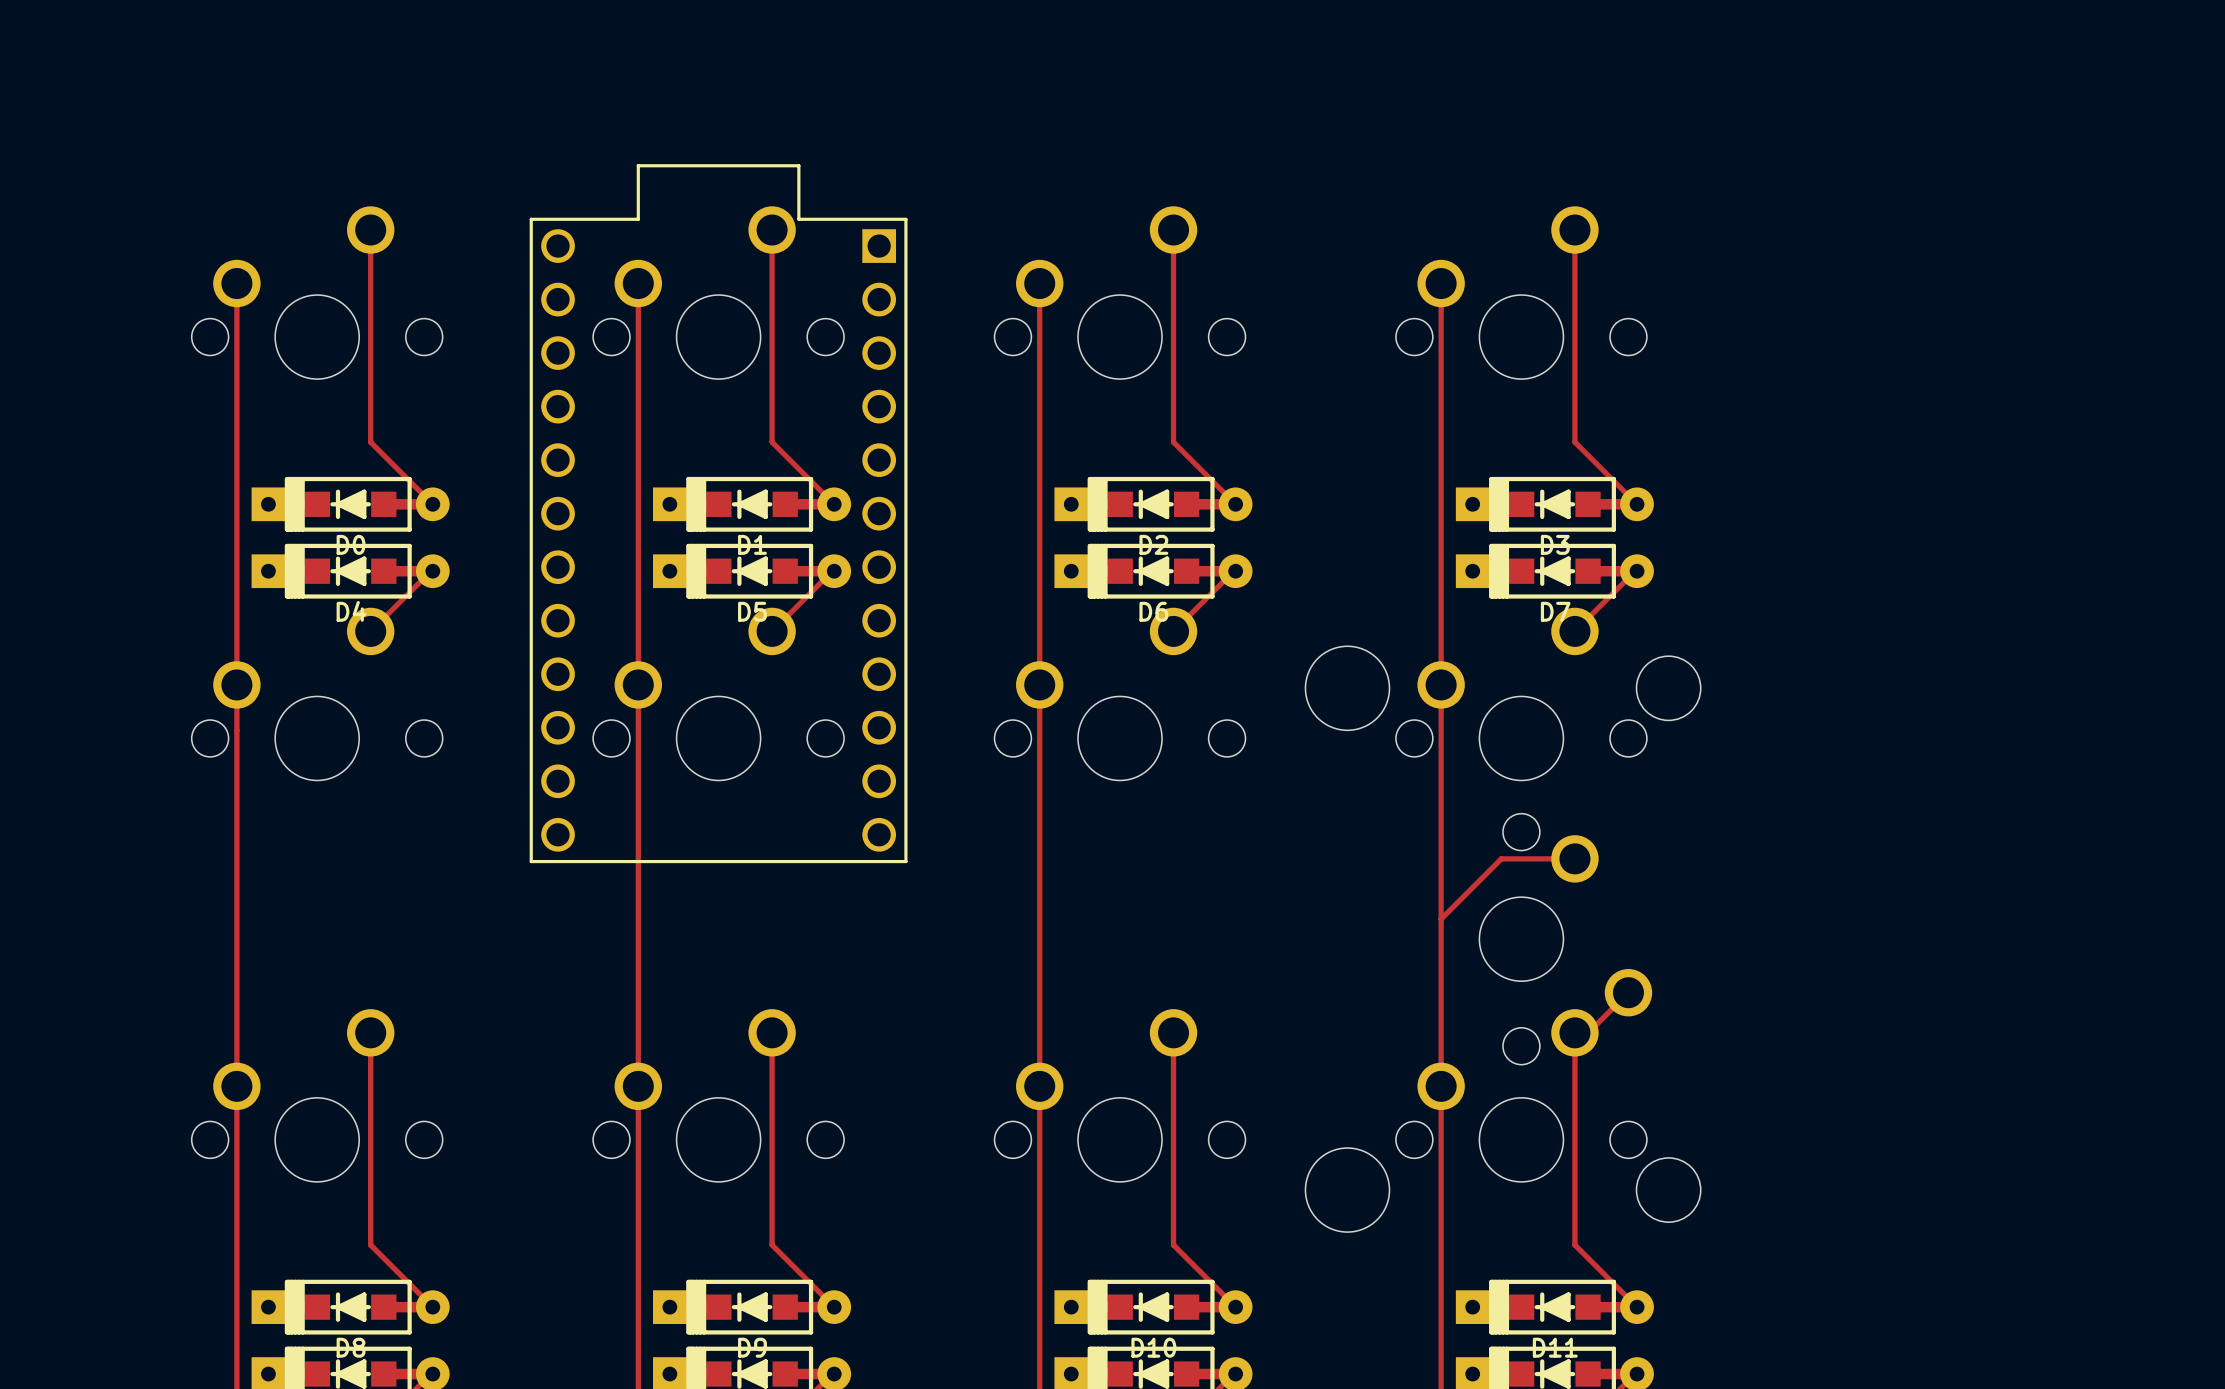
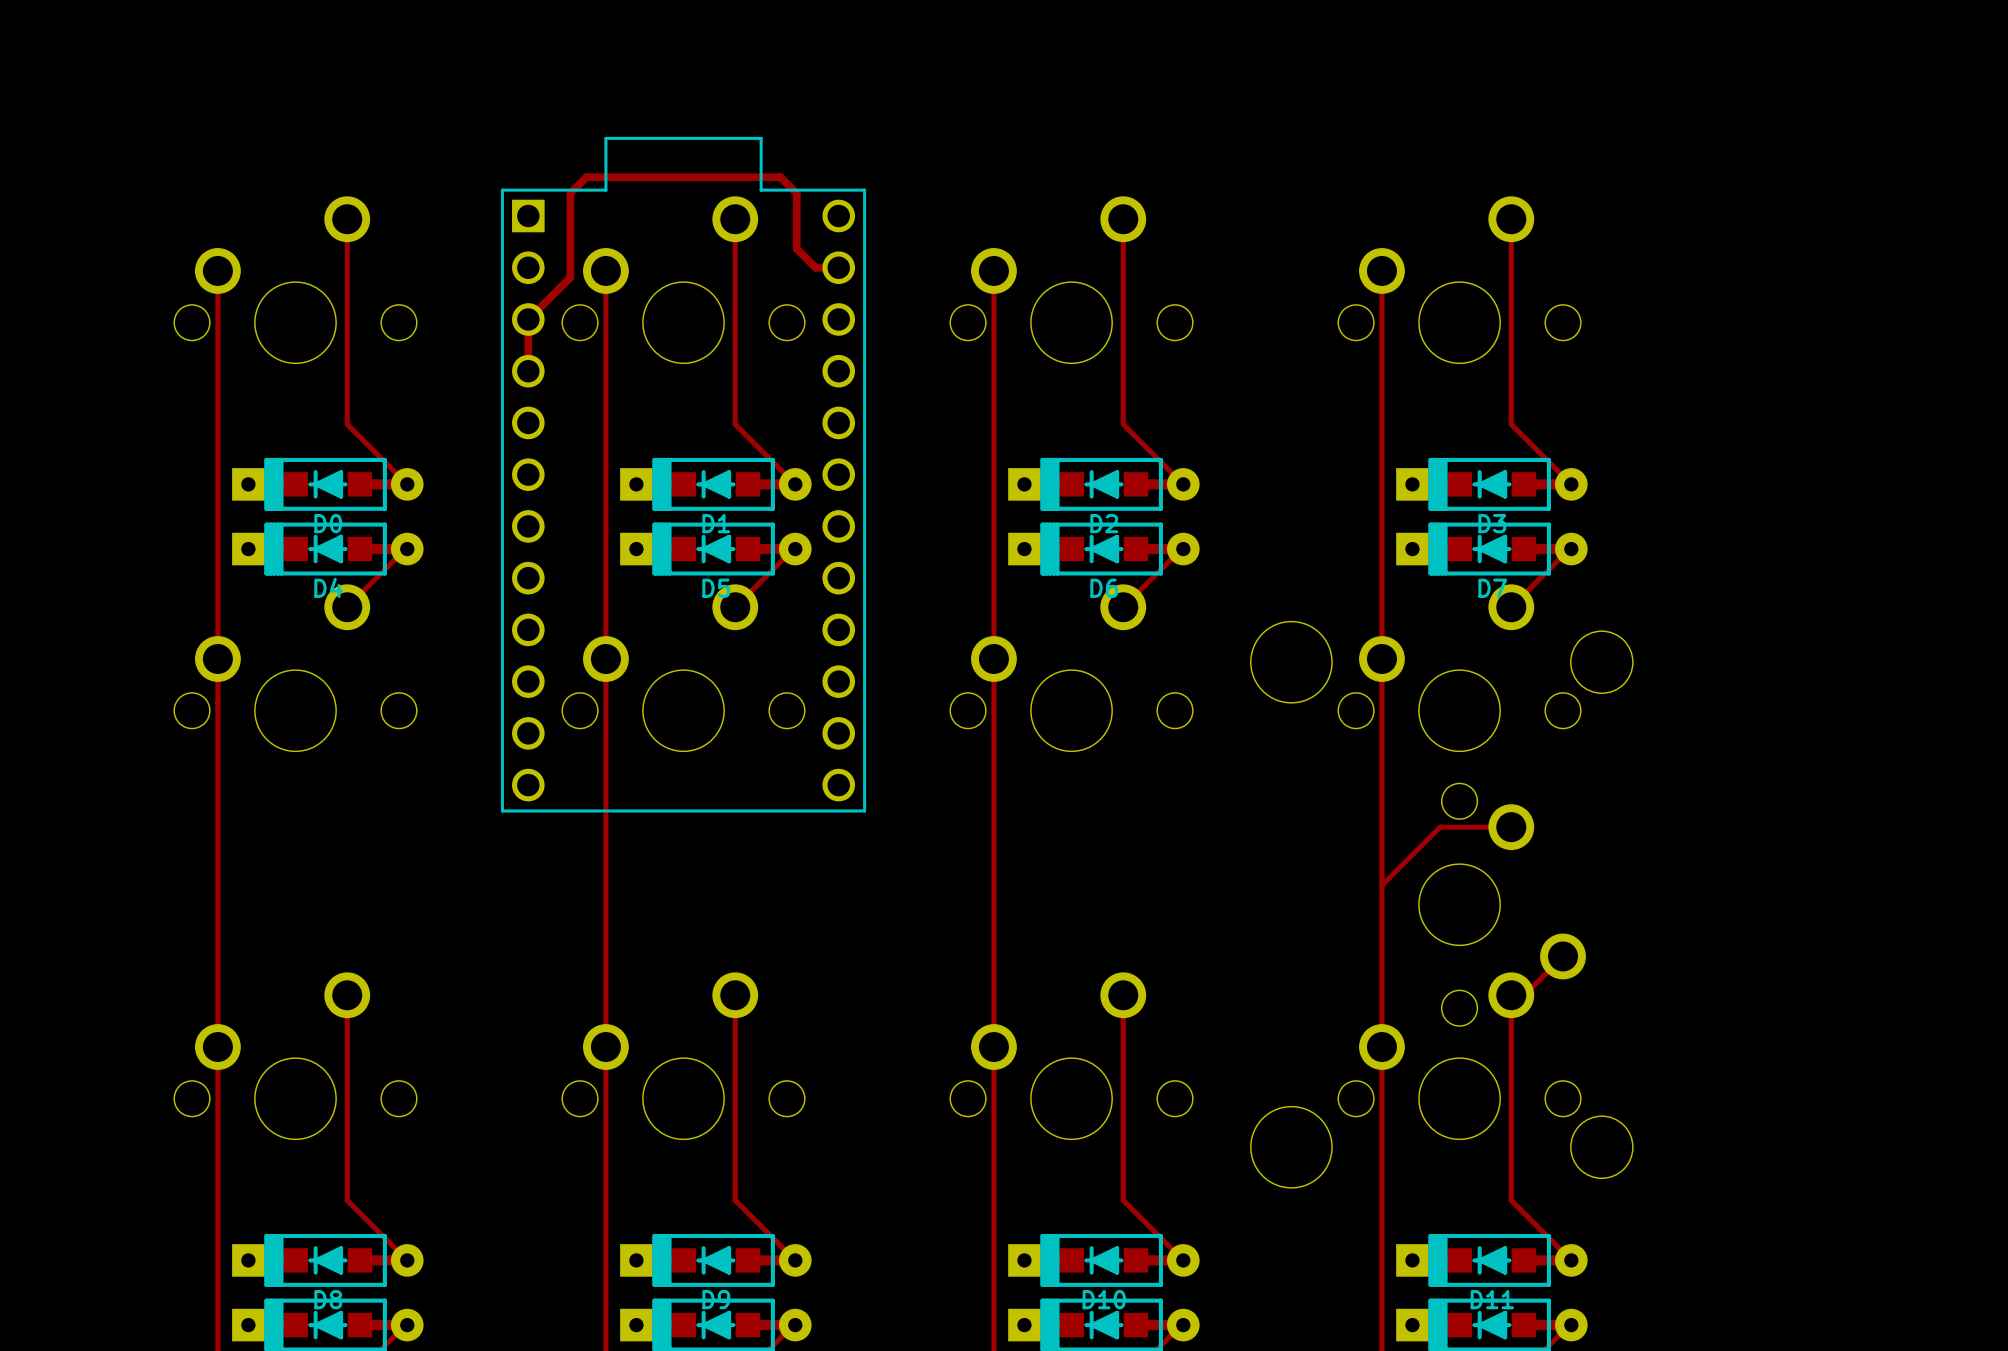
track: none -> (838, 267) (815, 267) (796, 248) (796, 193) (780, 177) (586, 177) (570, 193) (570, 277) (528, 319) (528, 371)
part side: bottom (718, 513) -> top (683, 474)

